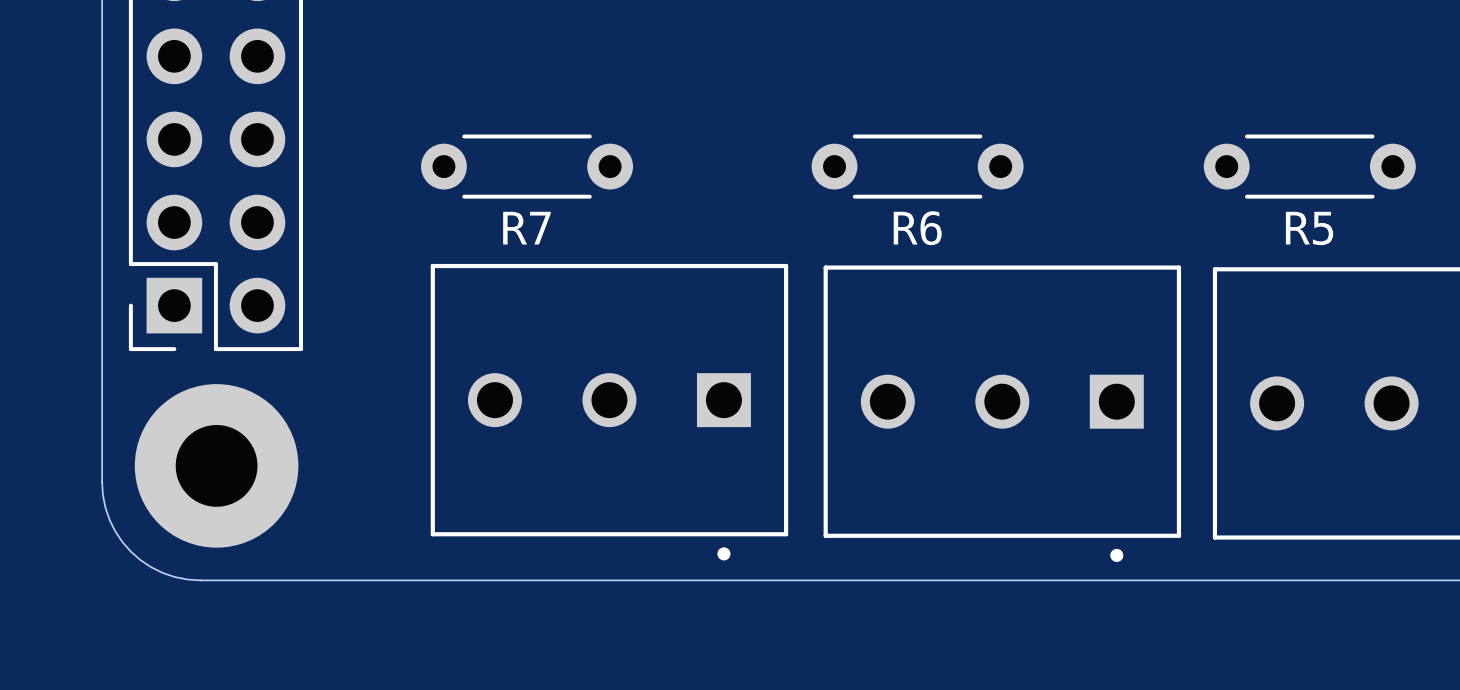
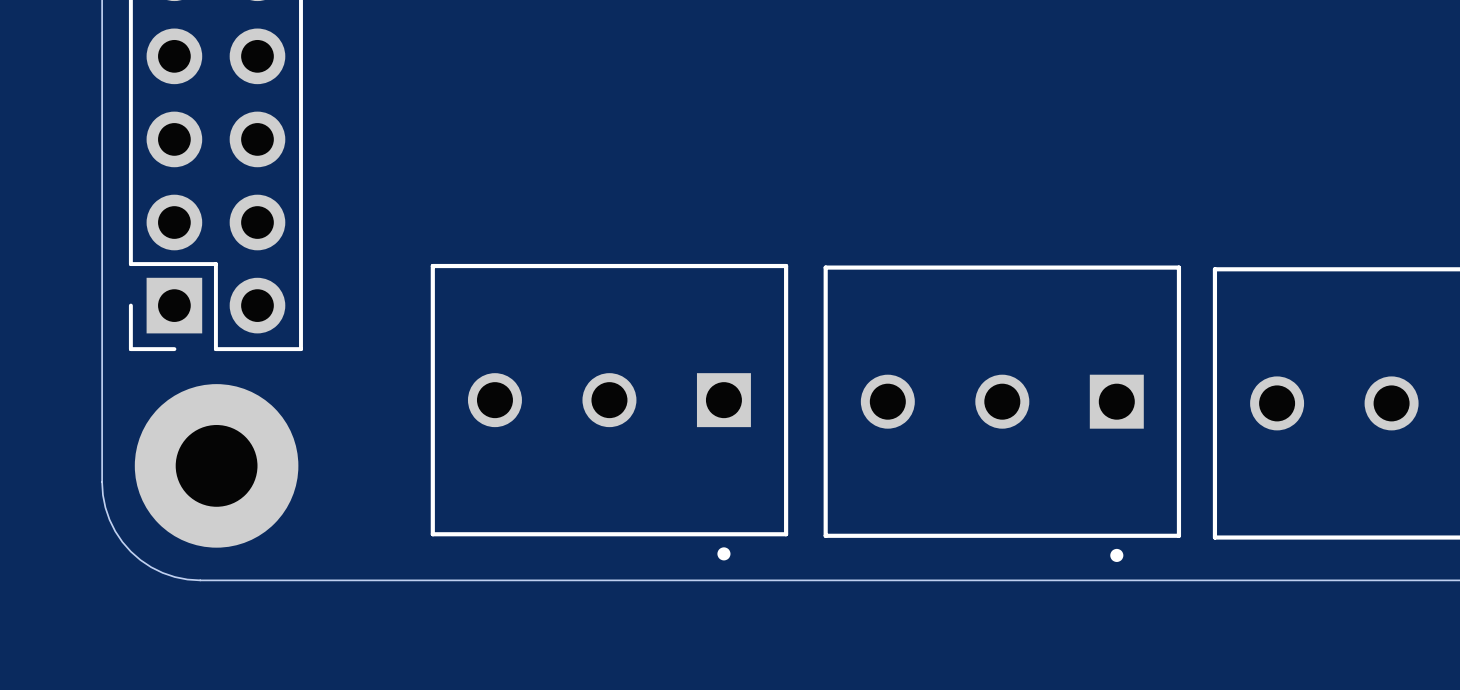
R7: (527, 166) -> none
R6: (917, 166) -> none
R5: (1309, 166) -> none

